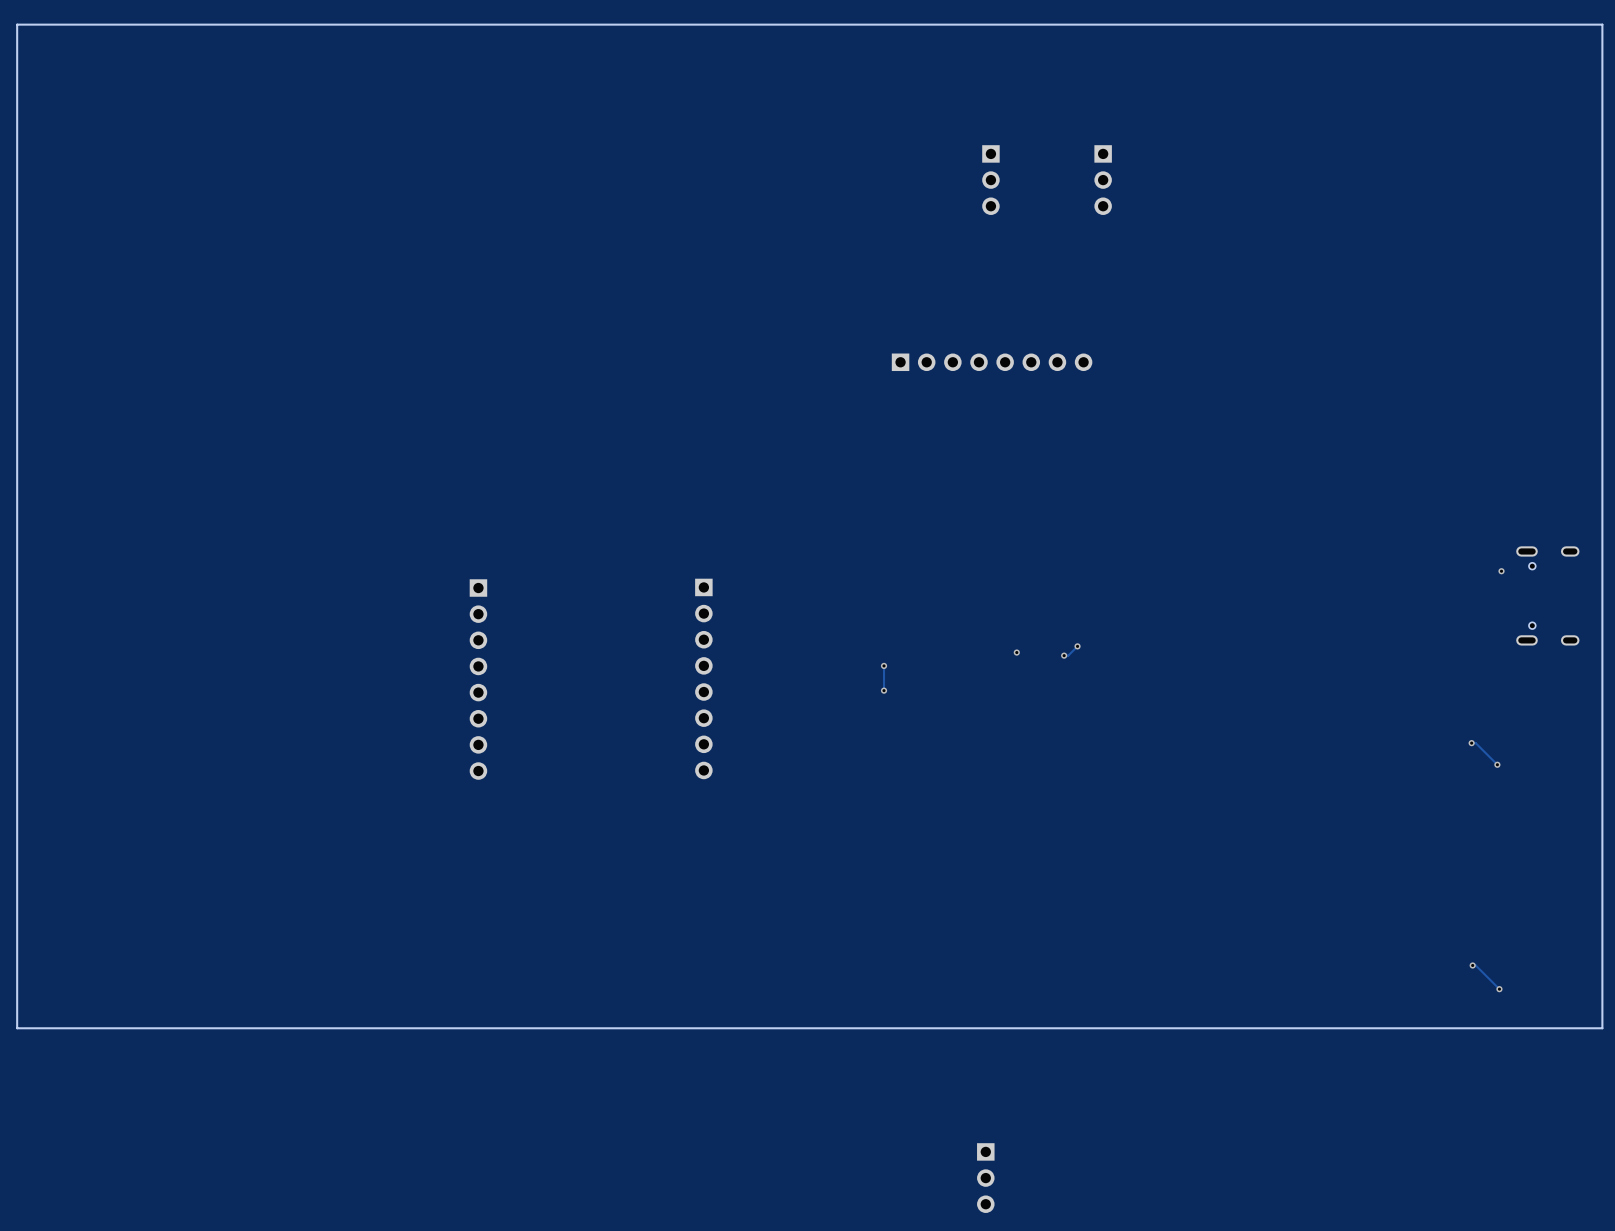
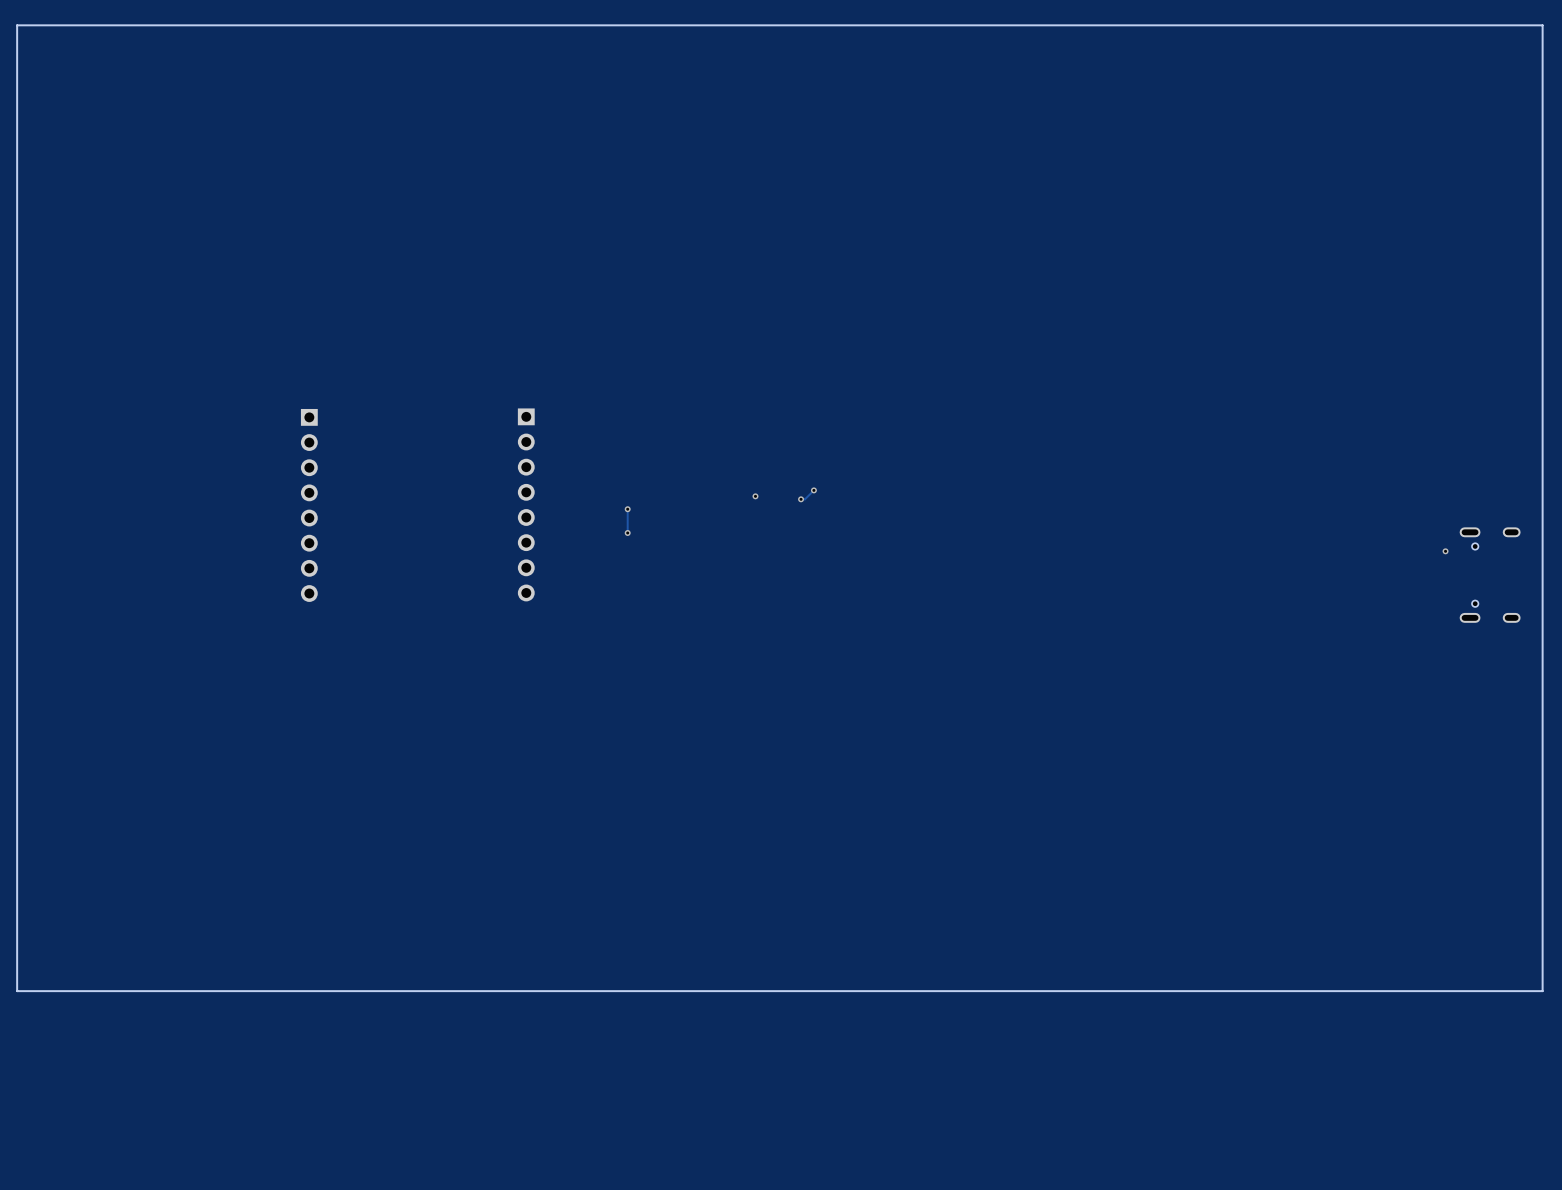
part: (990, 180) -> none
part: (1103, 180) -> none
part: (992, 362) -> none
track: none -> (813, 490) (805, 499) (801, 499)
via: none -> (813, 490)
via: none -> (755, 496)
via: none -> (801, 499)
part: none -> (309, 505)
part: none -> (526, 504)
track: none -> (627, 509) (627, 532)
via: none -> (627, 509)
via: none -> (627, 532)
track: (1077, 646) (1068, 655) (1064, 655) -> none
via: (1077, 646) -> none
via: (1016, 652) -> none
via: (1064, 655) -> none
track: (884, 665) (884, 690) -> none
via: (884, 665) -> none
part: (703, 678) -> none
part: (478, 679) -> none
via: (884, 690) -> none
track: (1471, 743) (1475, 743) (1497, 764) -> none
via: (1471, 743) -> none
via: (1497, 764) -> none
track: (1472, 965) (1475, 965) (1499, 989) -> none
via: (1472, 965) -> none
via: (1499, 989) -> none
part: (985, 1178) -> none

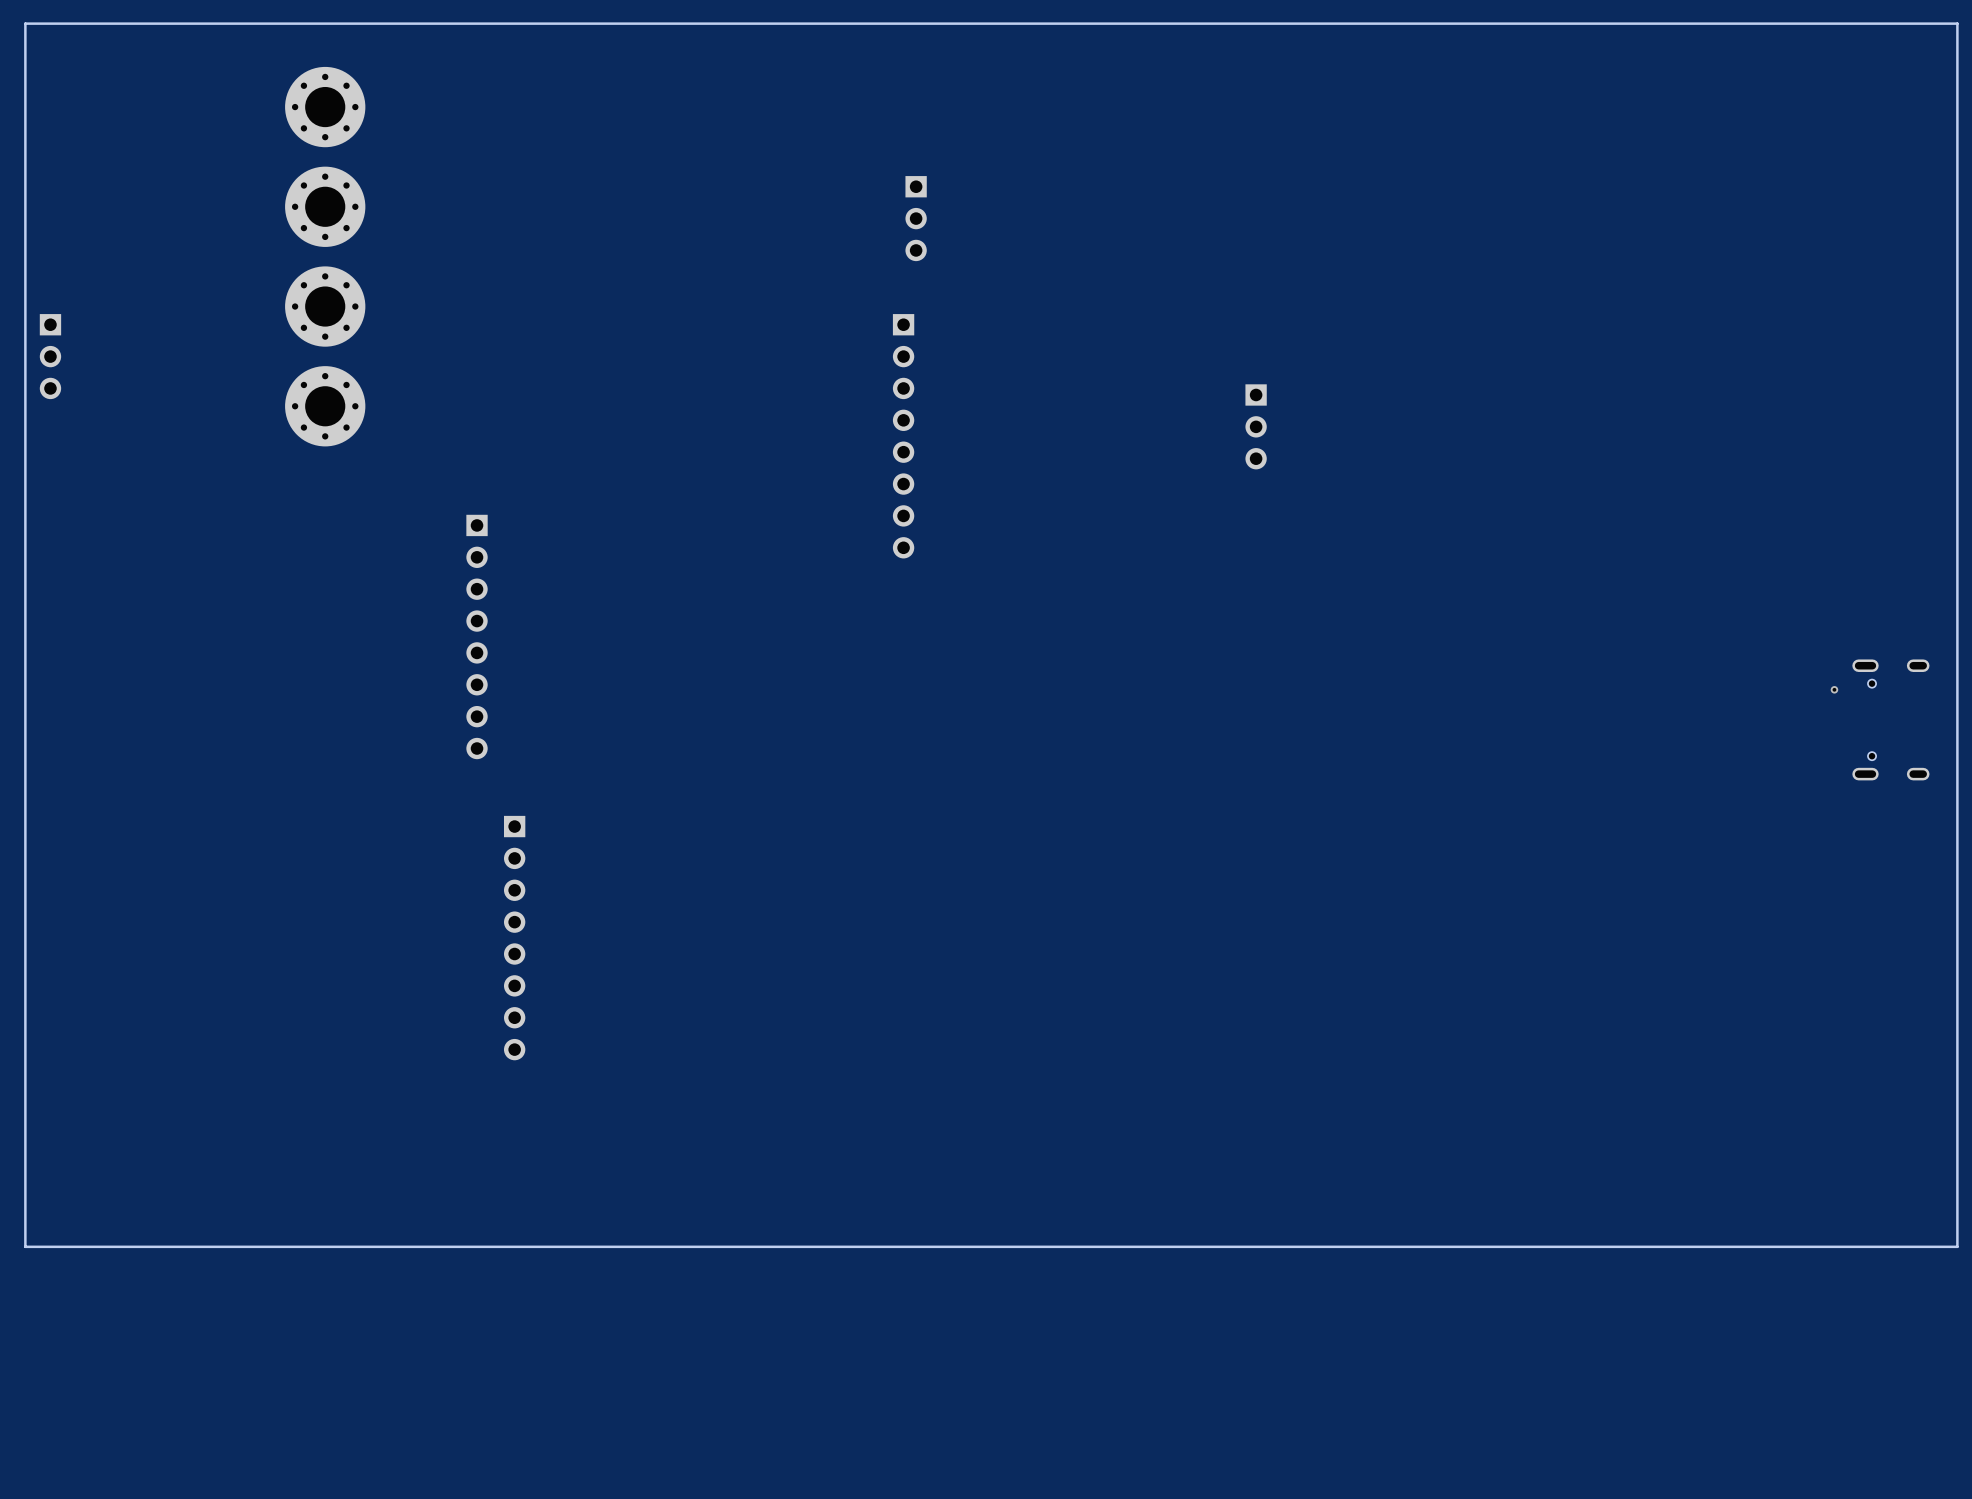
part: none -> (325, 107)
part: none -> (325, 206)
part: none -> (916, 218)
part: none -> (325, 306)
part: none -> (50, 356)
part: none -> (325, 406)
part: none -> (1256, 426)
part: none -> (903, 436)
track: (813, 490) (805, 499) (801, 499) -> none
via: (813, 490) -> none
via: (755, 496) -> none
via: (801, 499) -> none
part: (526, 504) -> none
part position: (309, 505) -> (477, 636)
track: (627, 509) (627, 532) -> none
via: (627, 509) -> none
via: (627, 532) -> none
part: none -> (514, 938)

